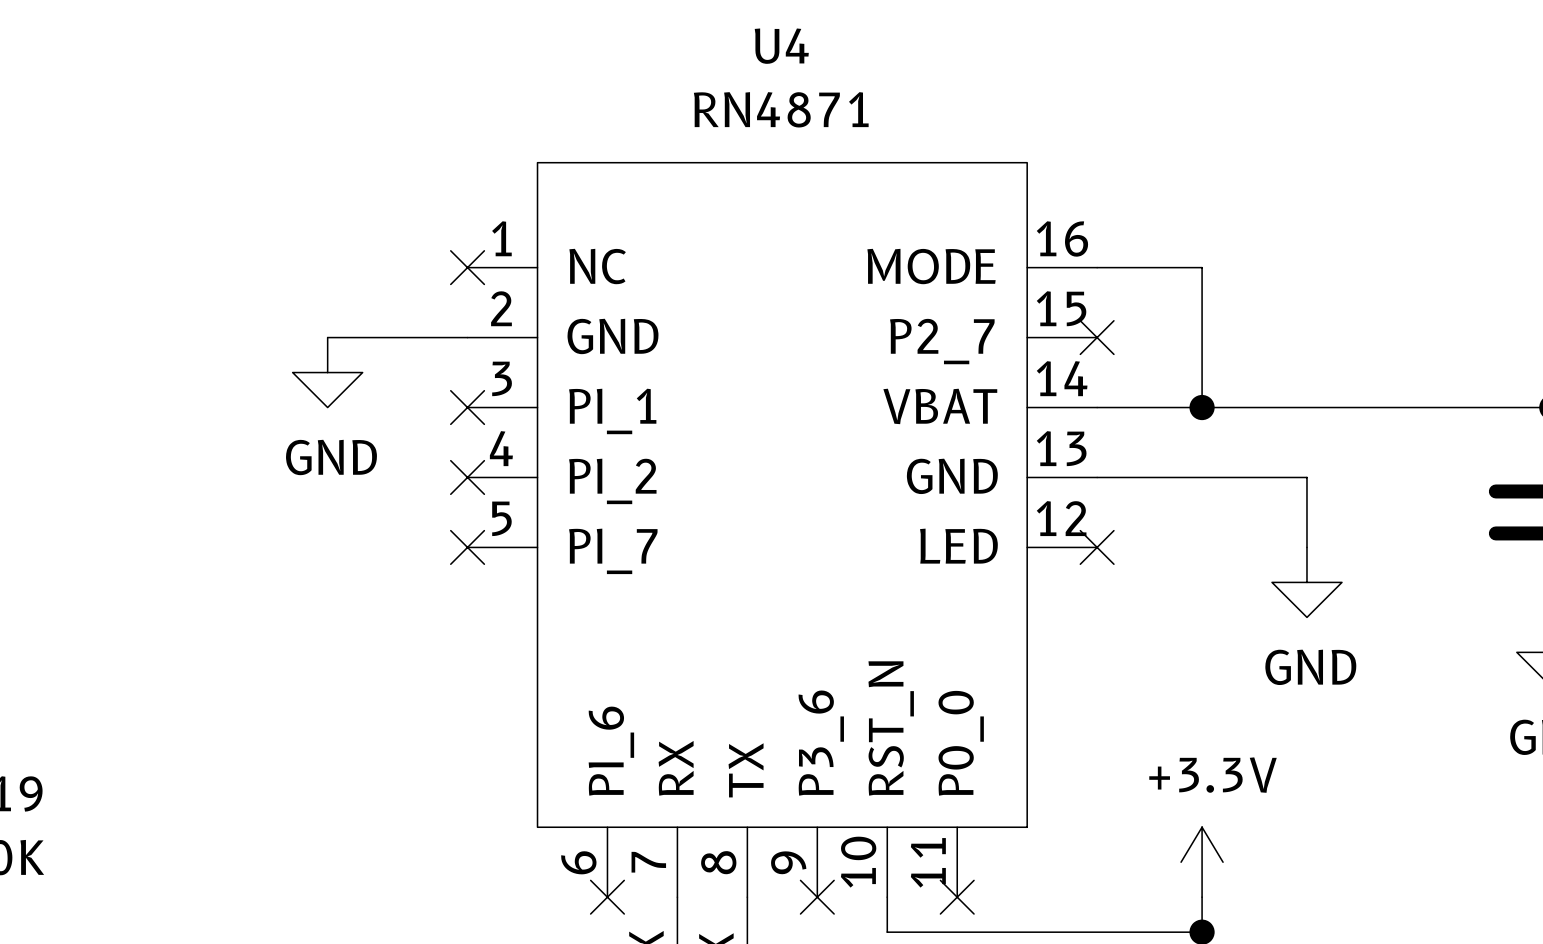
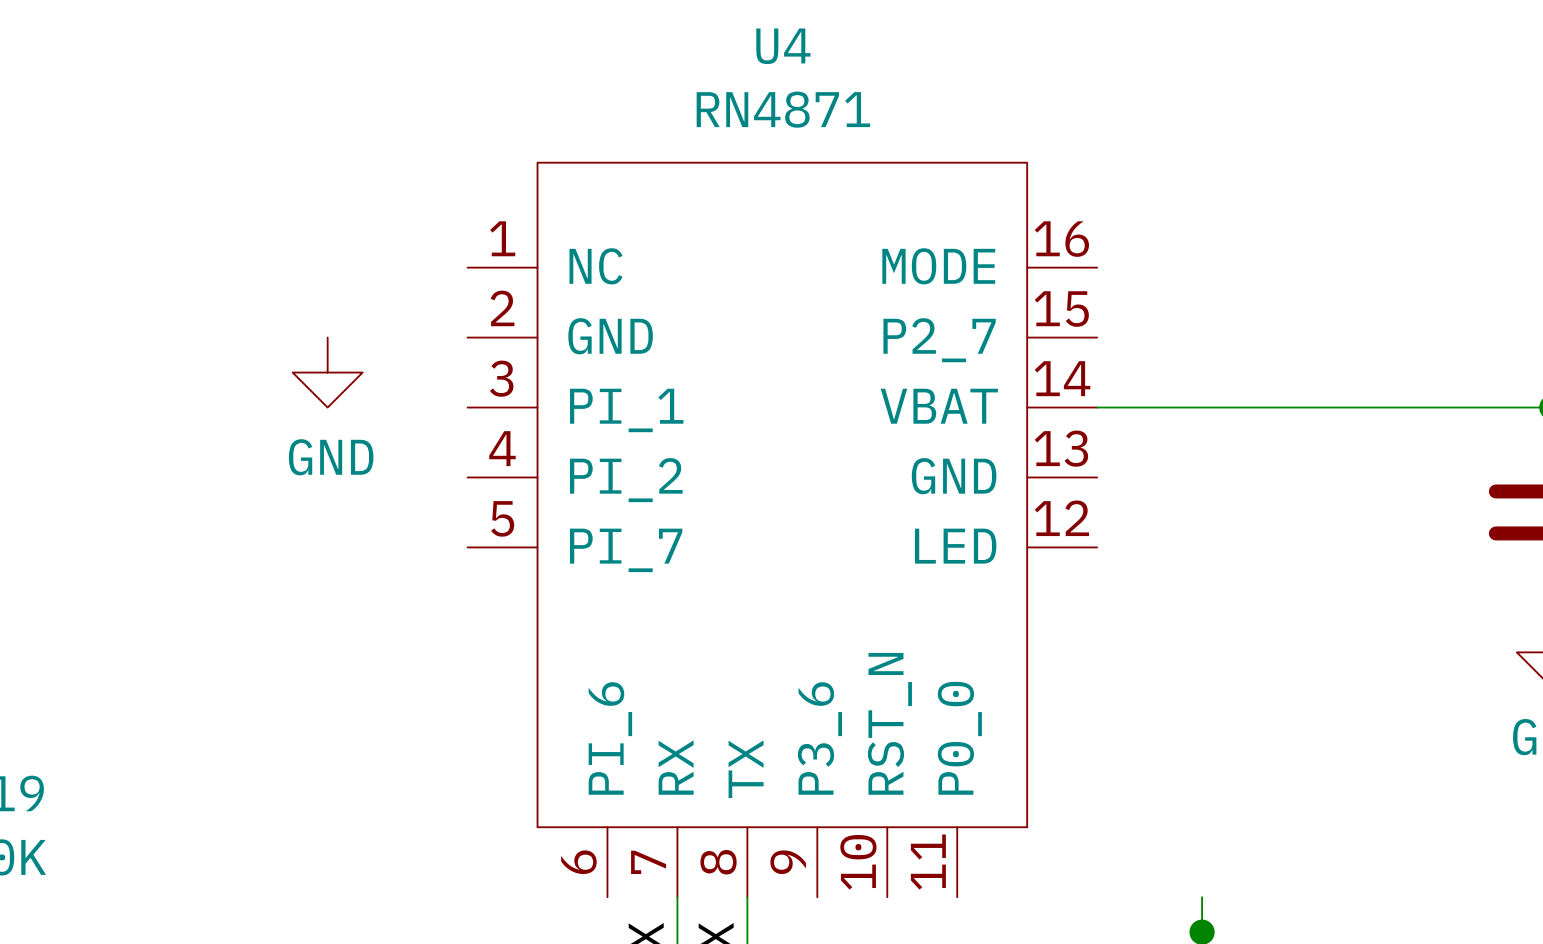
no-connect mark: (467, 267) -> none
wire: (1097, 267) (1202, 267) (1202, 407) -> none
wire: (327, 337) (467, 337) -> none
no-connect mark: (1097, 337) -> none
no-connect mark: (467, 407) -> none
junction: (1202, 407) -> none
no-connect mark: (467, 477) -> none
wire: (1097, 477) (1306, 477) (1306, 547) -> none
no-connect mark: (467, 547) -> none
no-connect mark: (1097, 547) -> none
power symbol: GND (1306, 582) -> none
power symbol: +3.3V (1202, 862) -> none
no-connect mark: (607, 897) -> none
no-connect mark: (817, 897) -> none
wire: (887, 897) (887, 932) (1202, 932) -> none
no-connect mark: (957, 897) -> none

